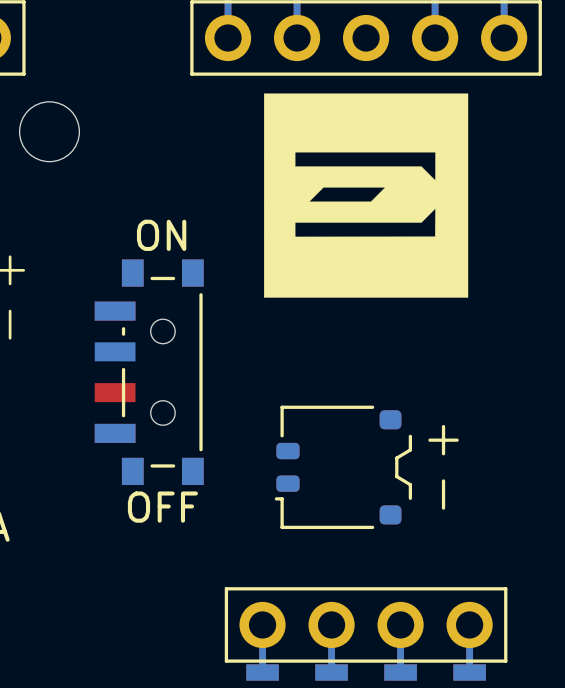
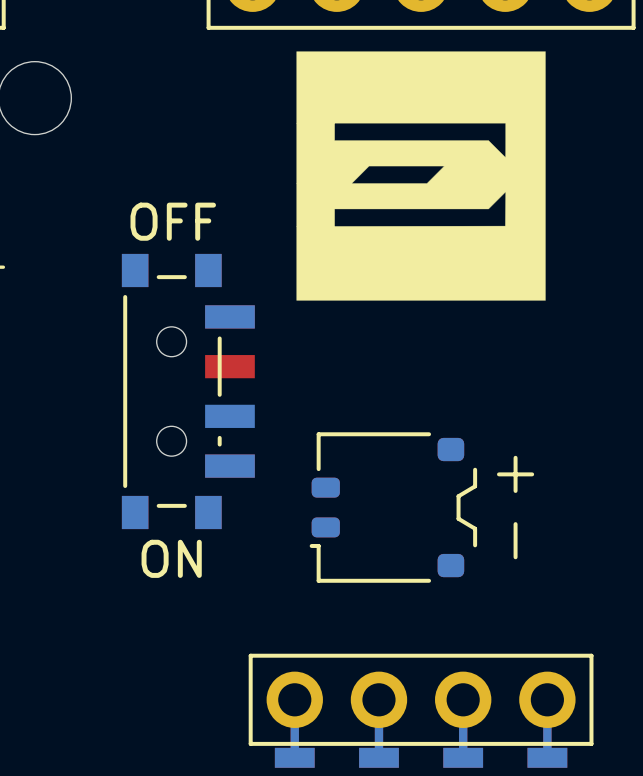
part footprint: [94, 259, 204, 486] -> [121, 253, 255, 530]

